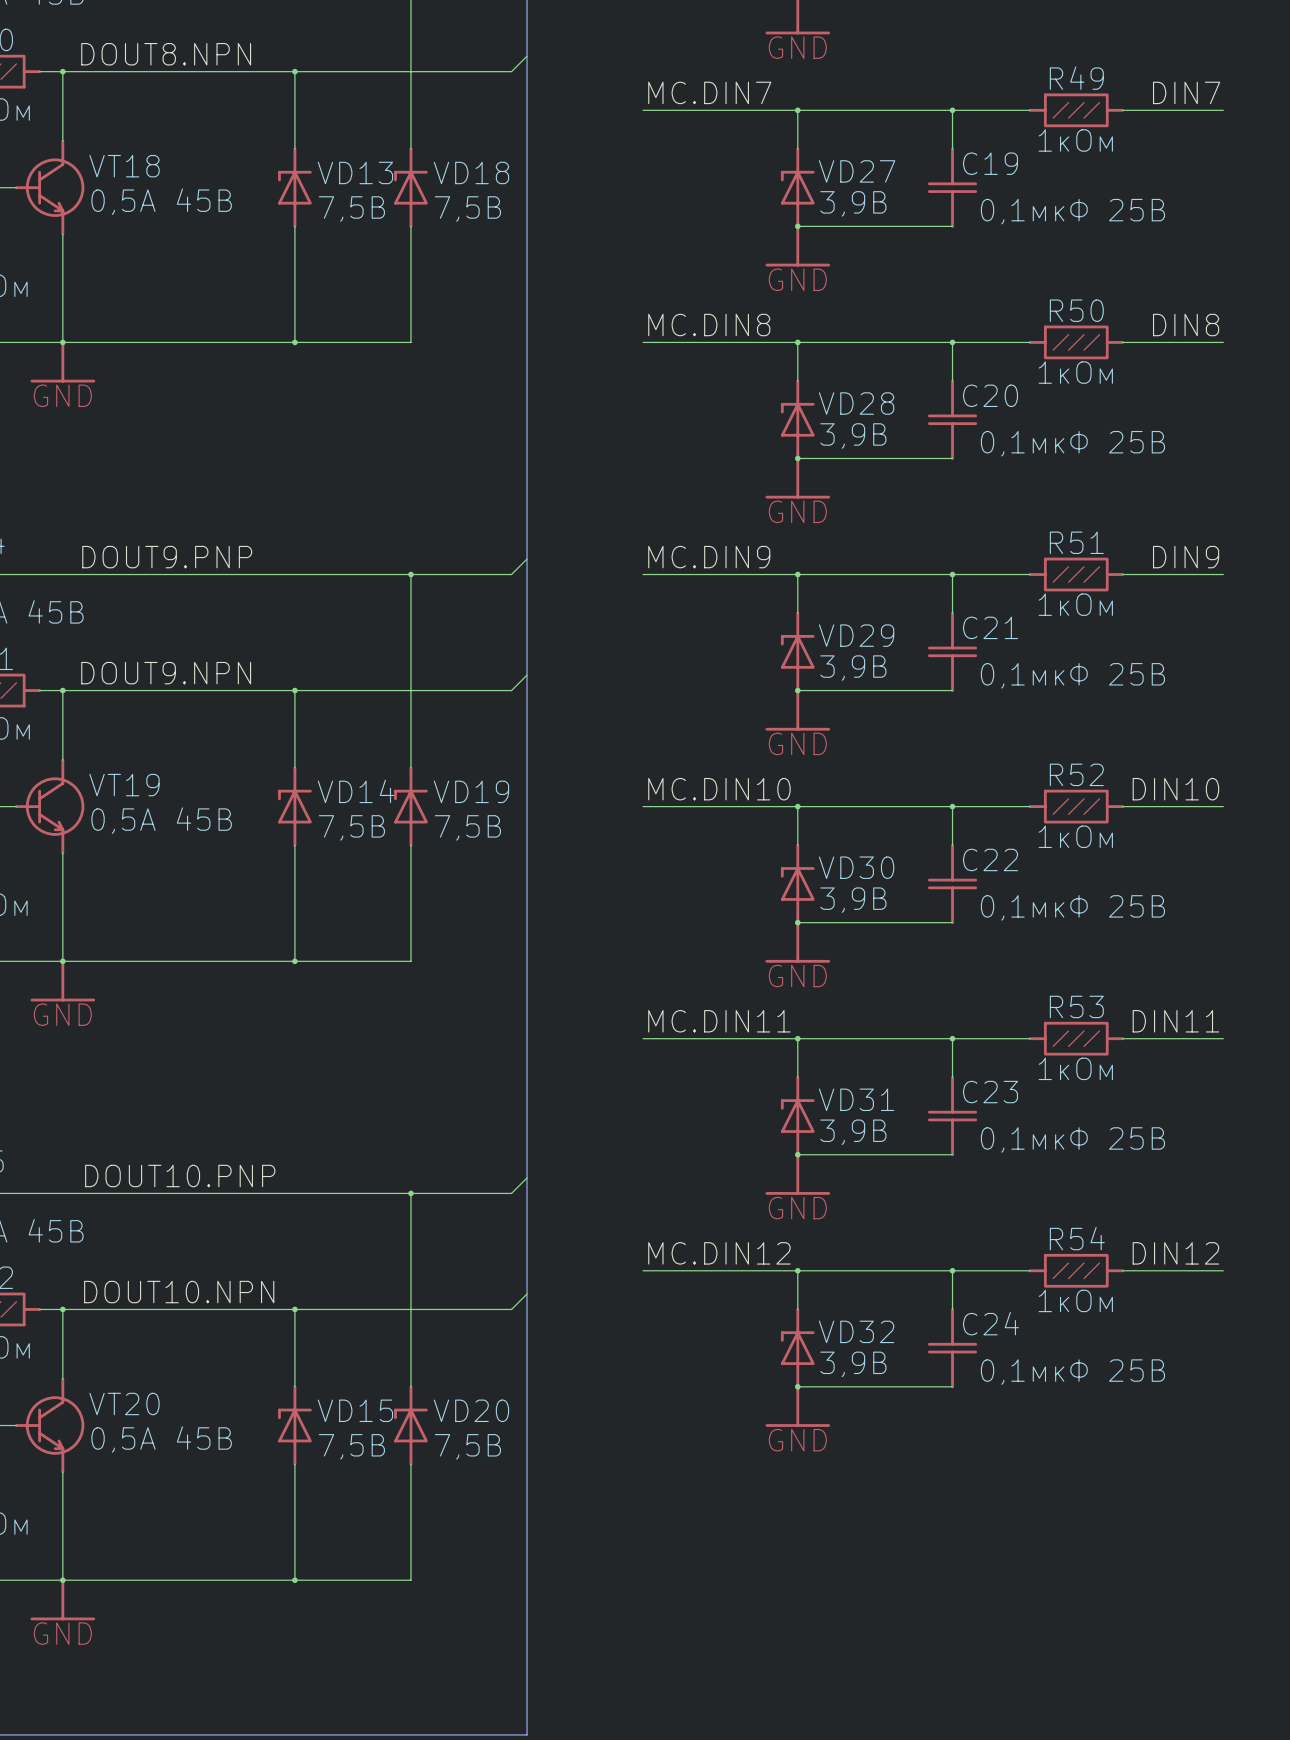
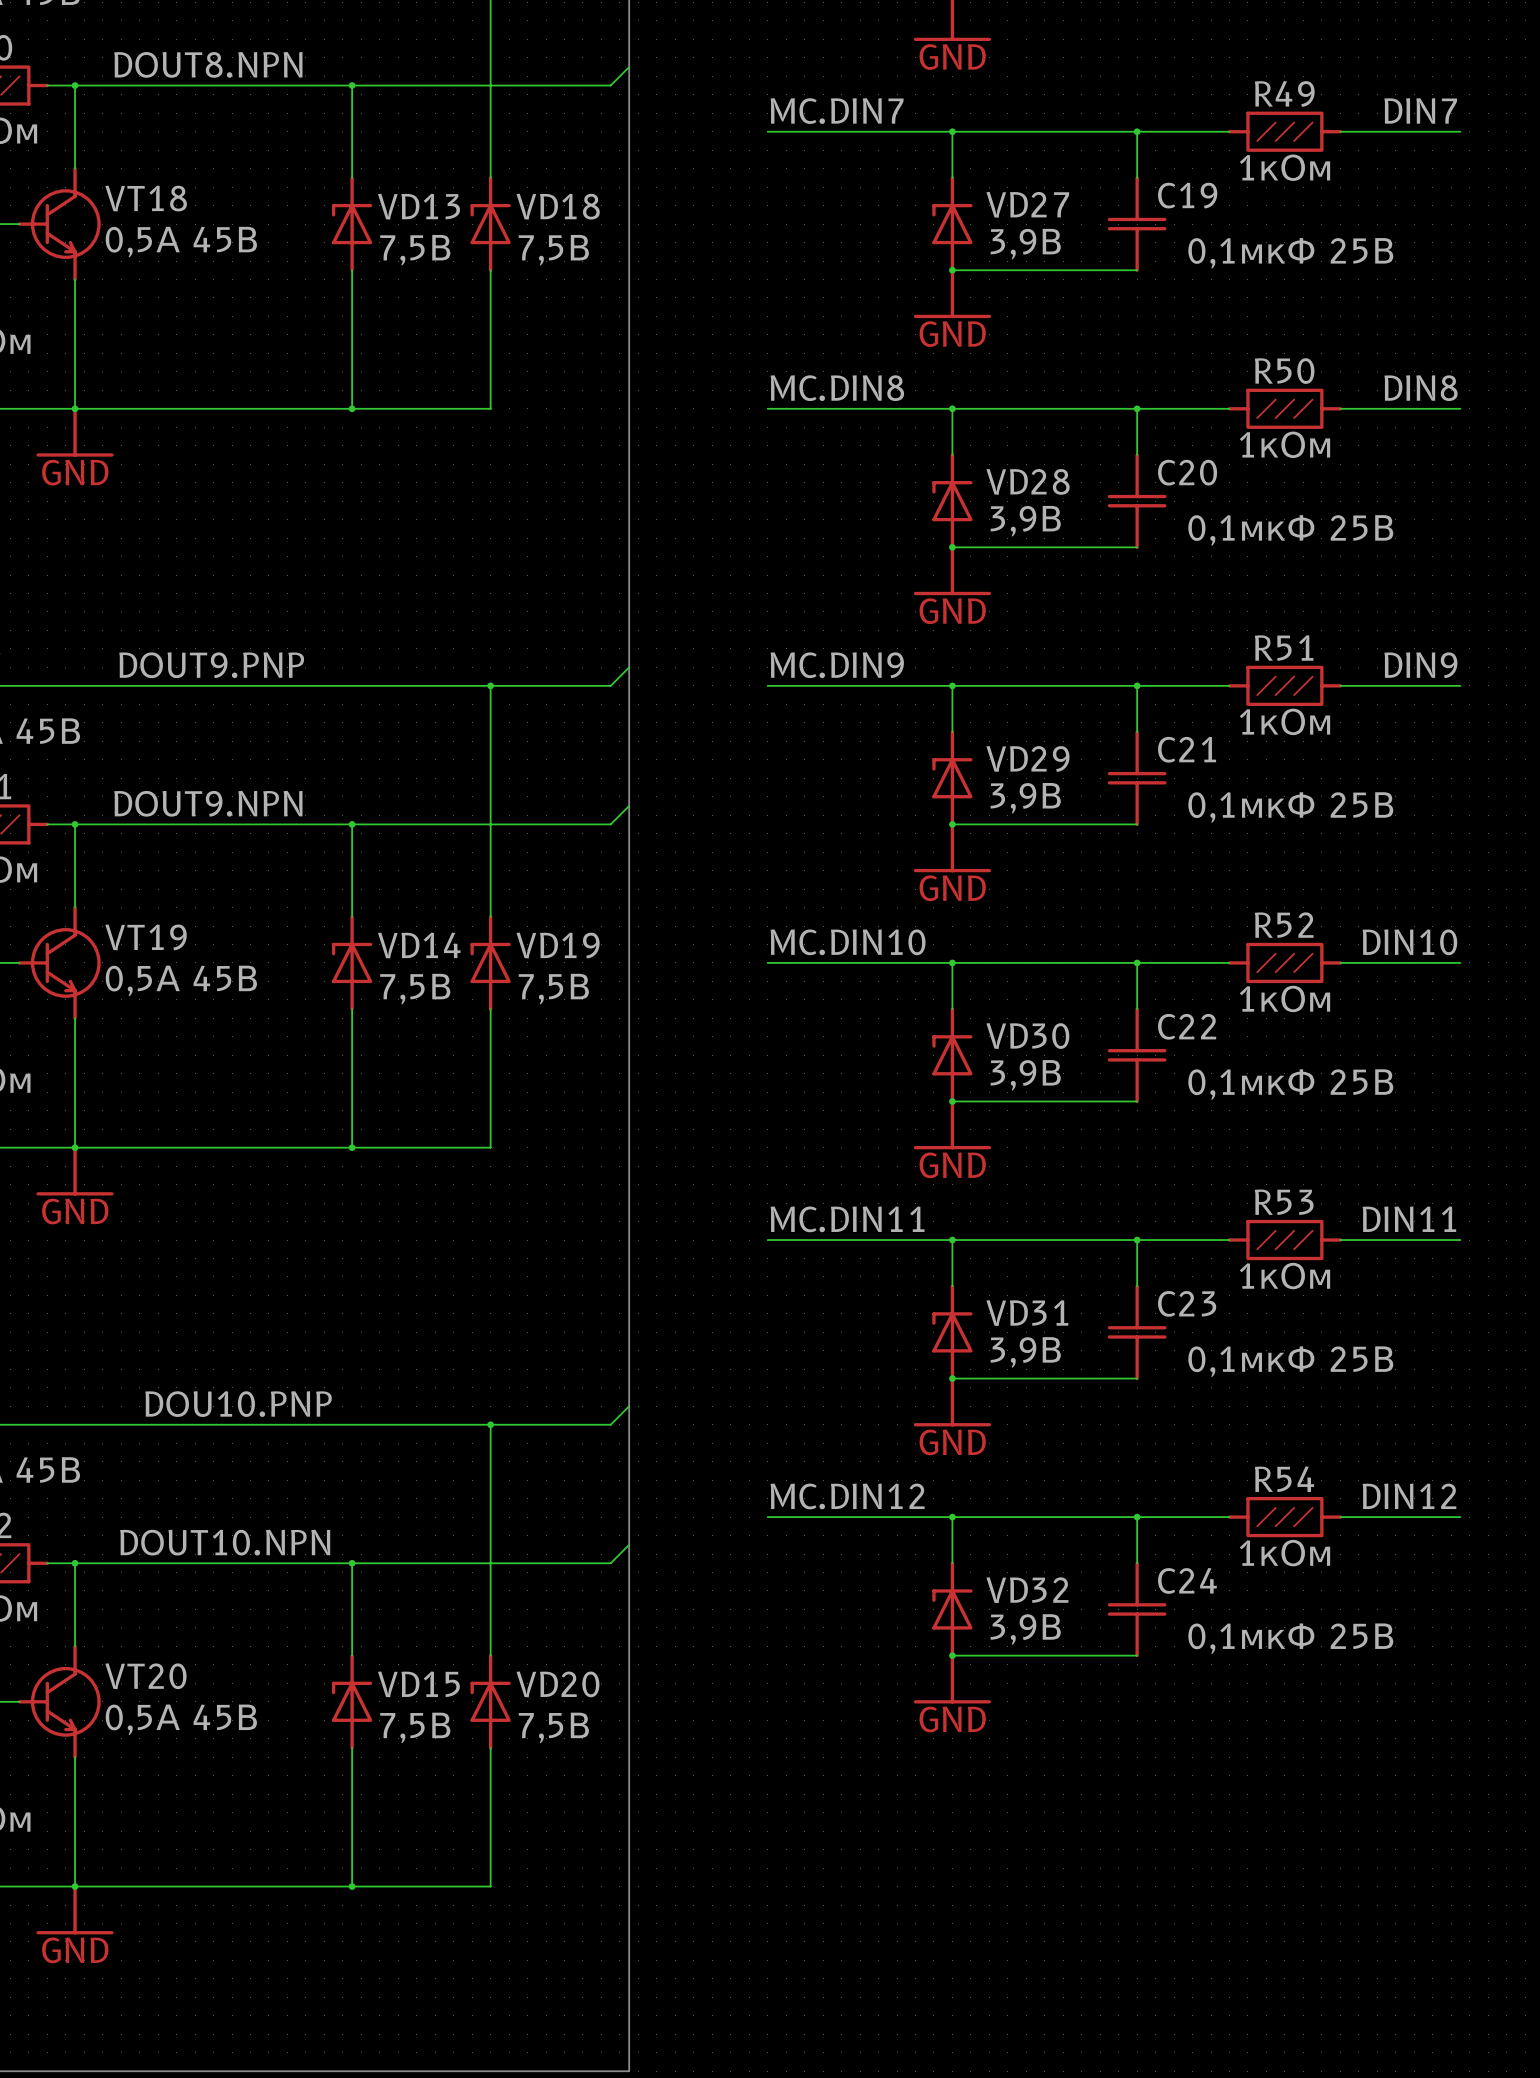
label: DOUT10.PNP (180, 1176) -> DOU10.PNP (238, 1404)

